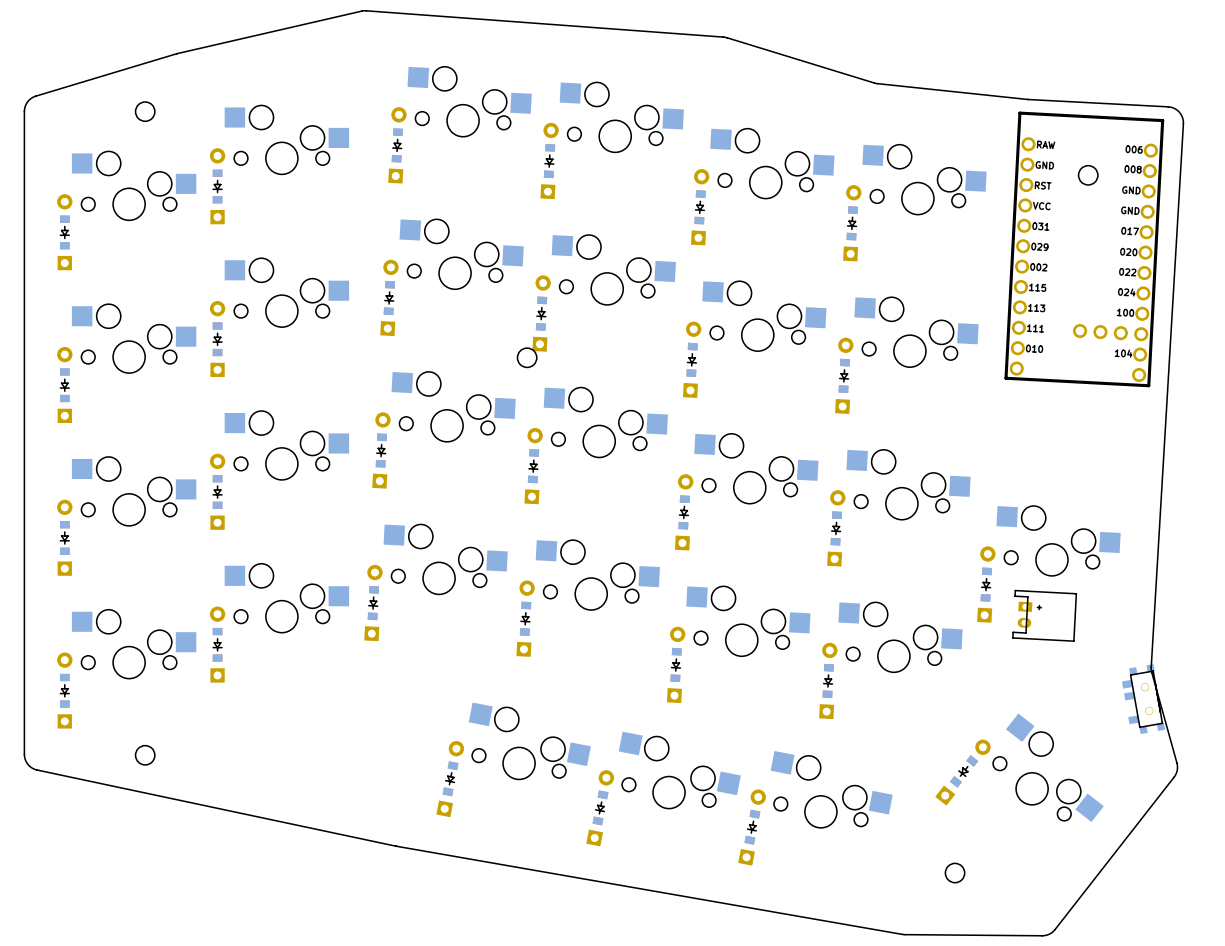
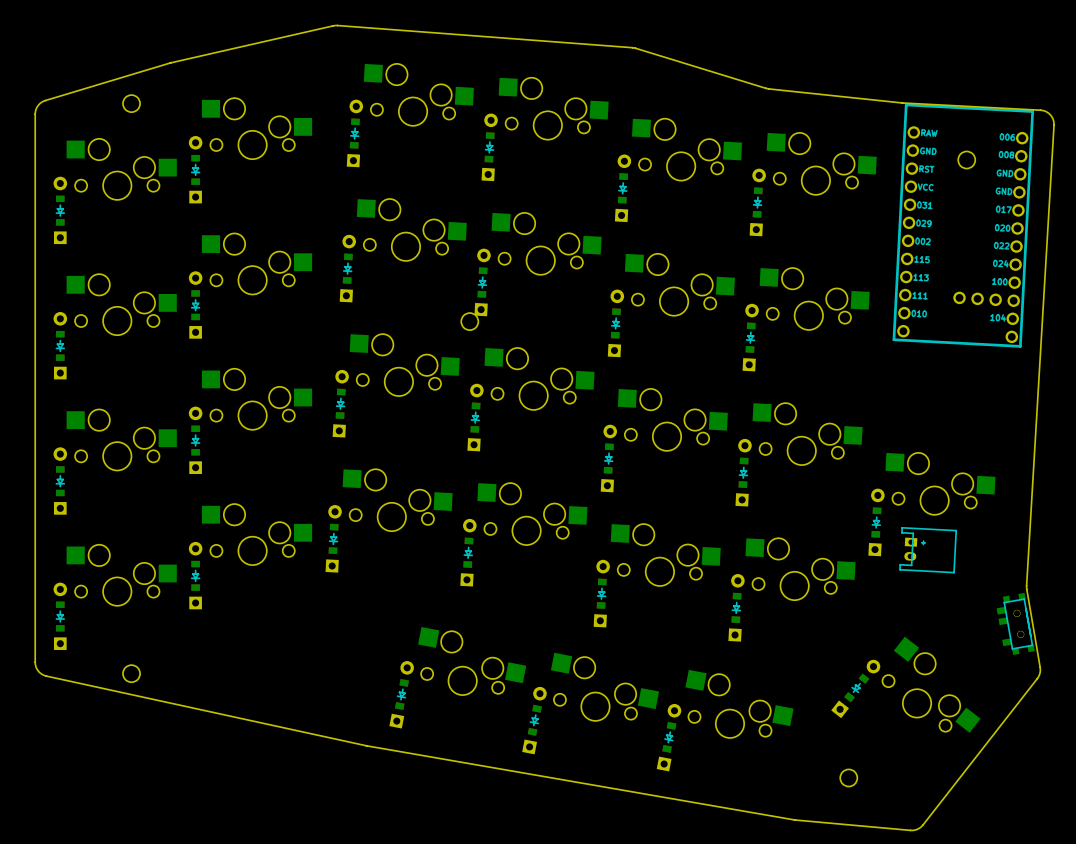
board edge: (366, 10) (723, 37) (875, 83) (1027, 99) (1168, 106) (1175, 108) (1180, 113) (1183, 123) (1151, 668) (1176, 762) (1177, 770) (1174, 777) (1052, 932) (1042, 935) (902, 934) (396, 846) (37, 770) (27, 764) (24, 754) (25, 105) (30, 98) (35, 96) (177, 53) (366, 10) -> (337, 25) (632, 47) (767, 88) (902, 102) (1040, 110) (1051, 116) (1054, 125) (1026, 585) (1040, 671) (1037, 678) (920, 827) (910, 830) (794, 819) (366, 745) (46, 676) (38, 671) (35, 662) (36, 108) (45, 100) (170, 62) (337, 25)

